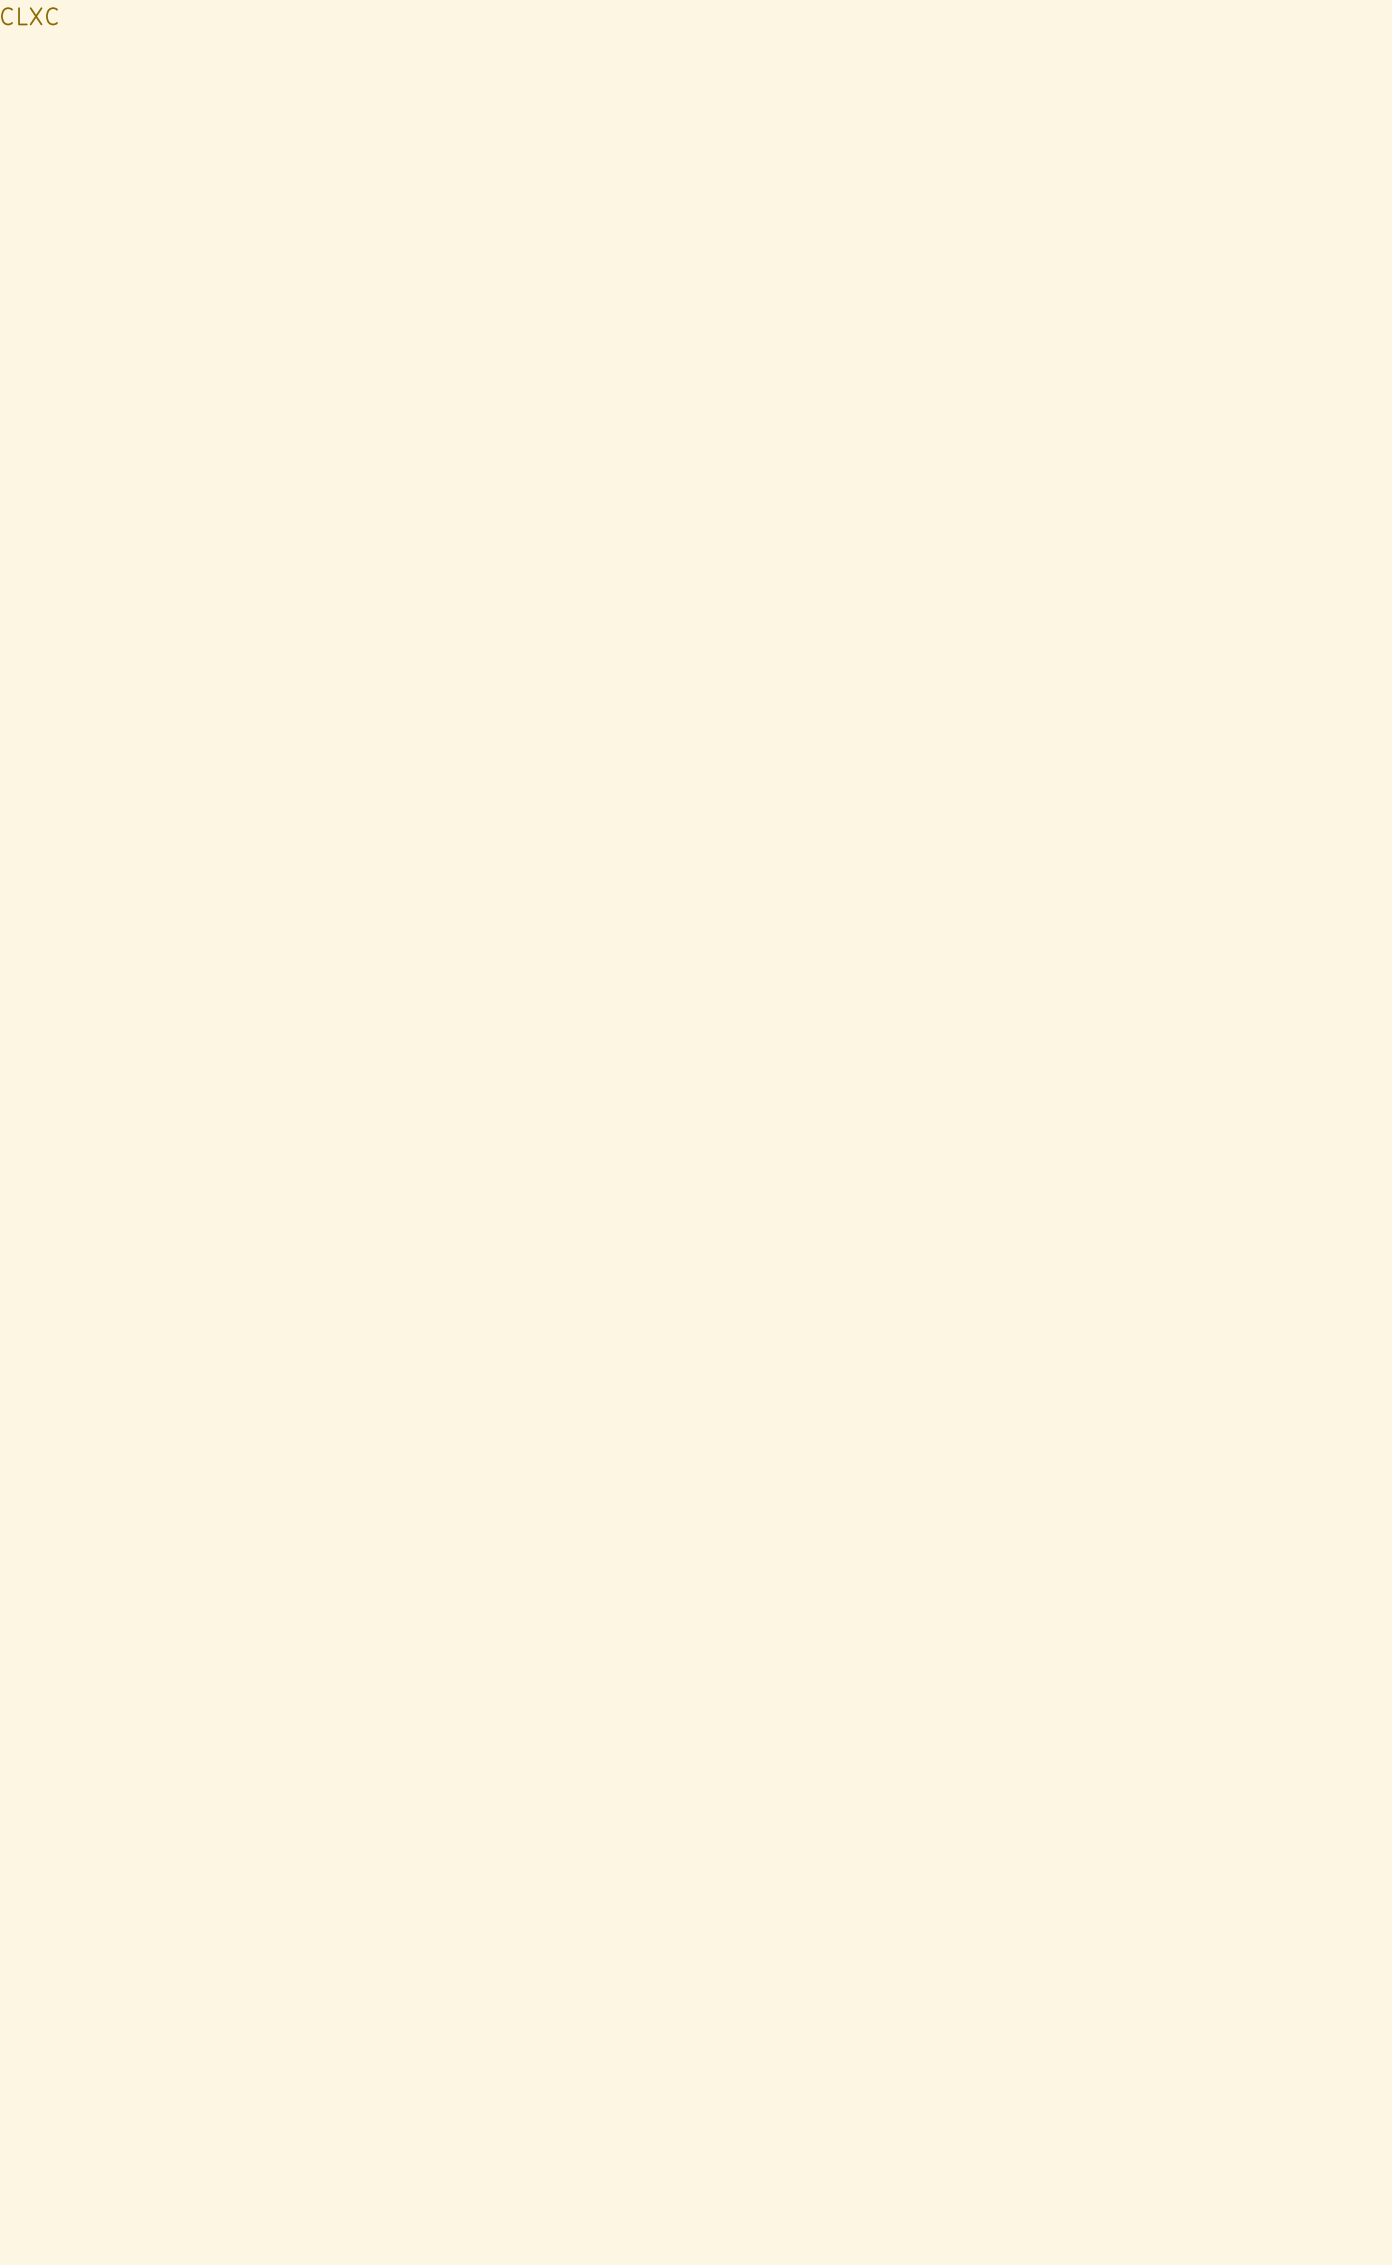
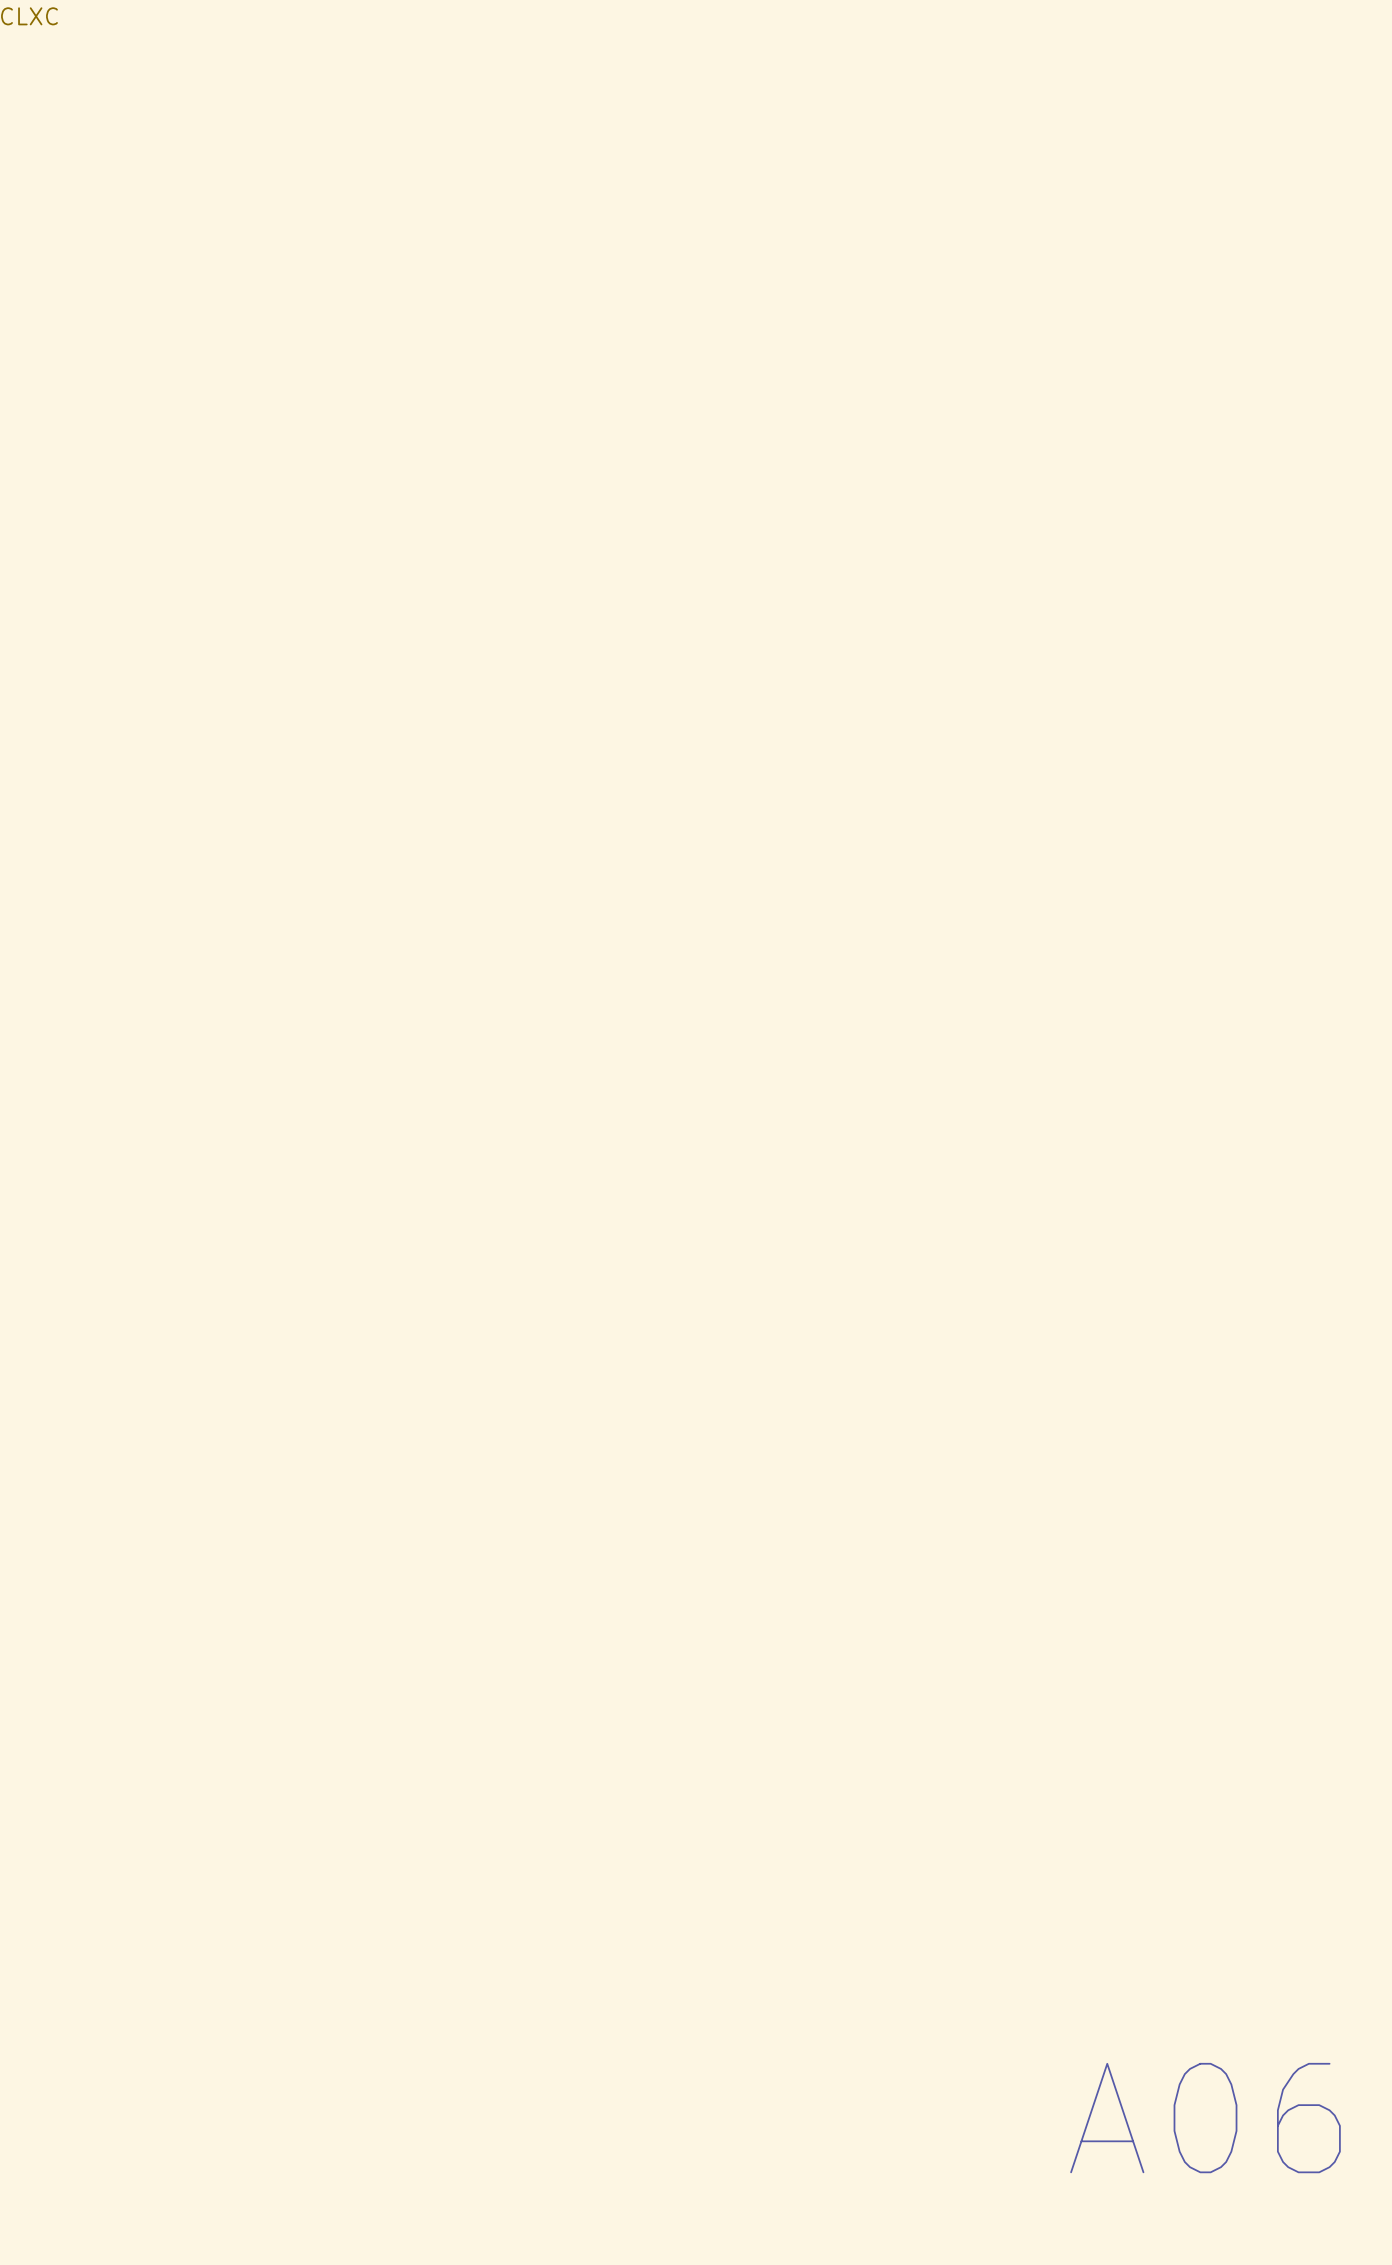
text: none -> A06 (1205, 2118)

